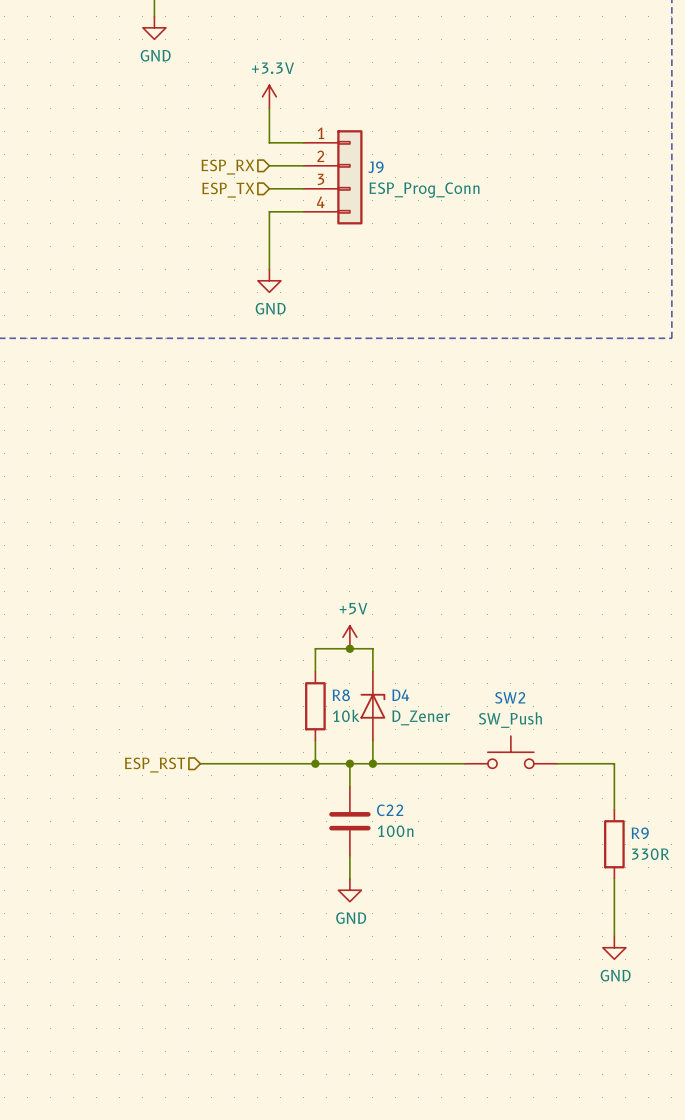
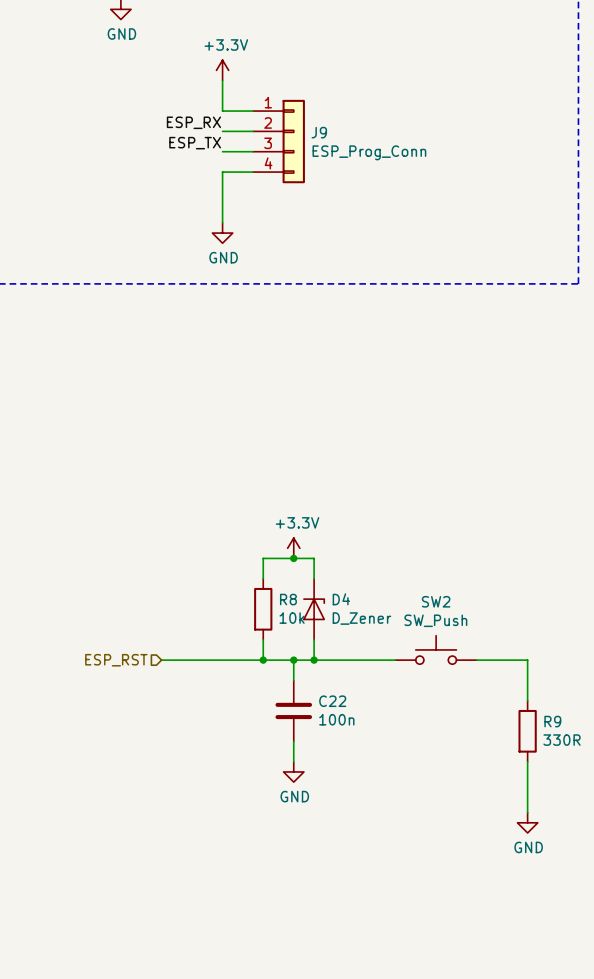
label: none -> ESP_RX (193, 122)
hierarchical label: ESP_RX (227, 167) -> none
label: none -> ESP_TX (195, 143)
hierarchical label: ESP_TX (228, 190) -> none
power symbol: +5V (349, 637) -> +3.3V (293, 548)

